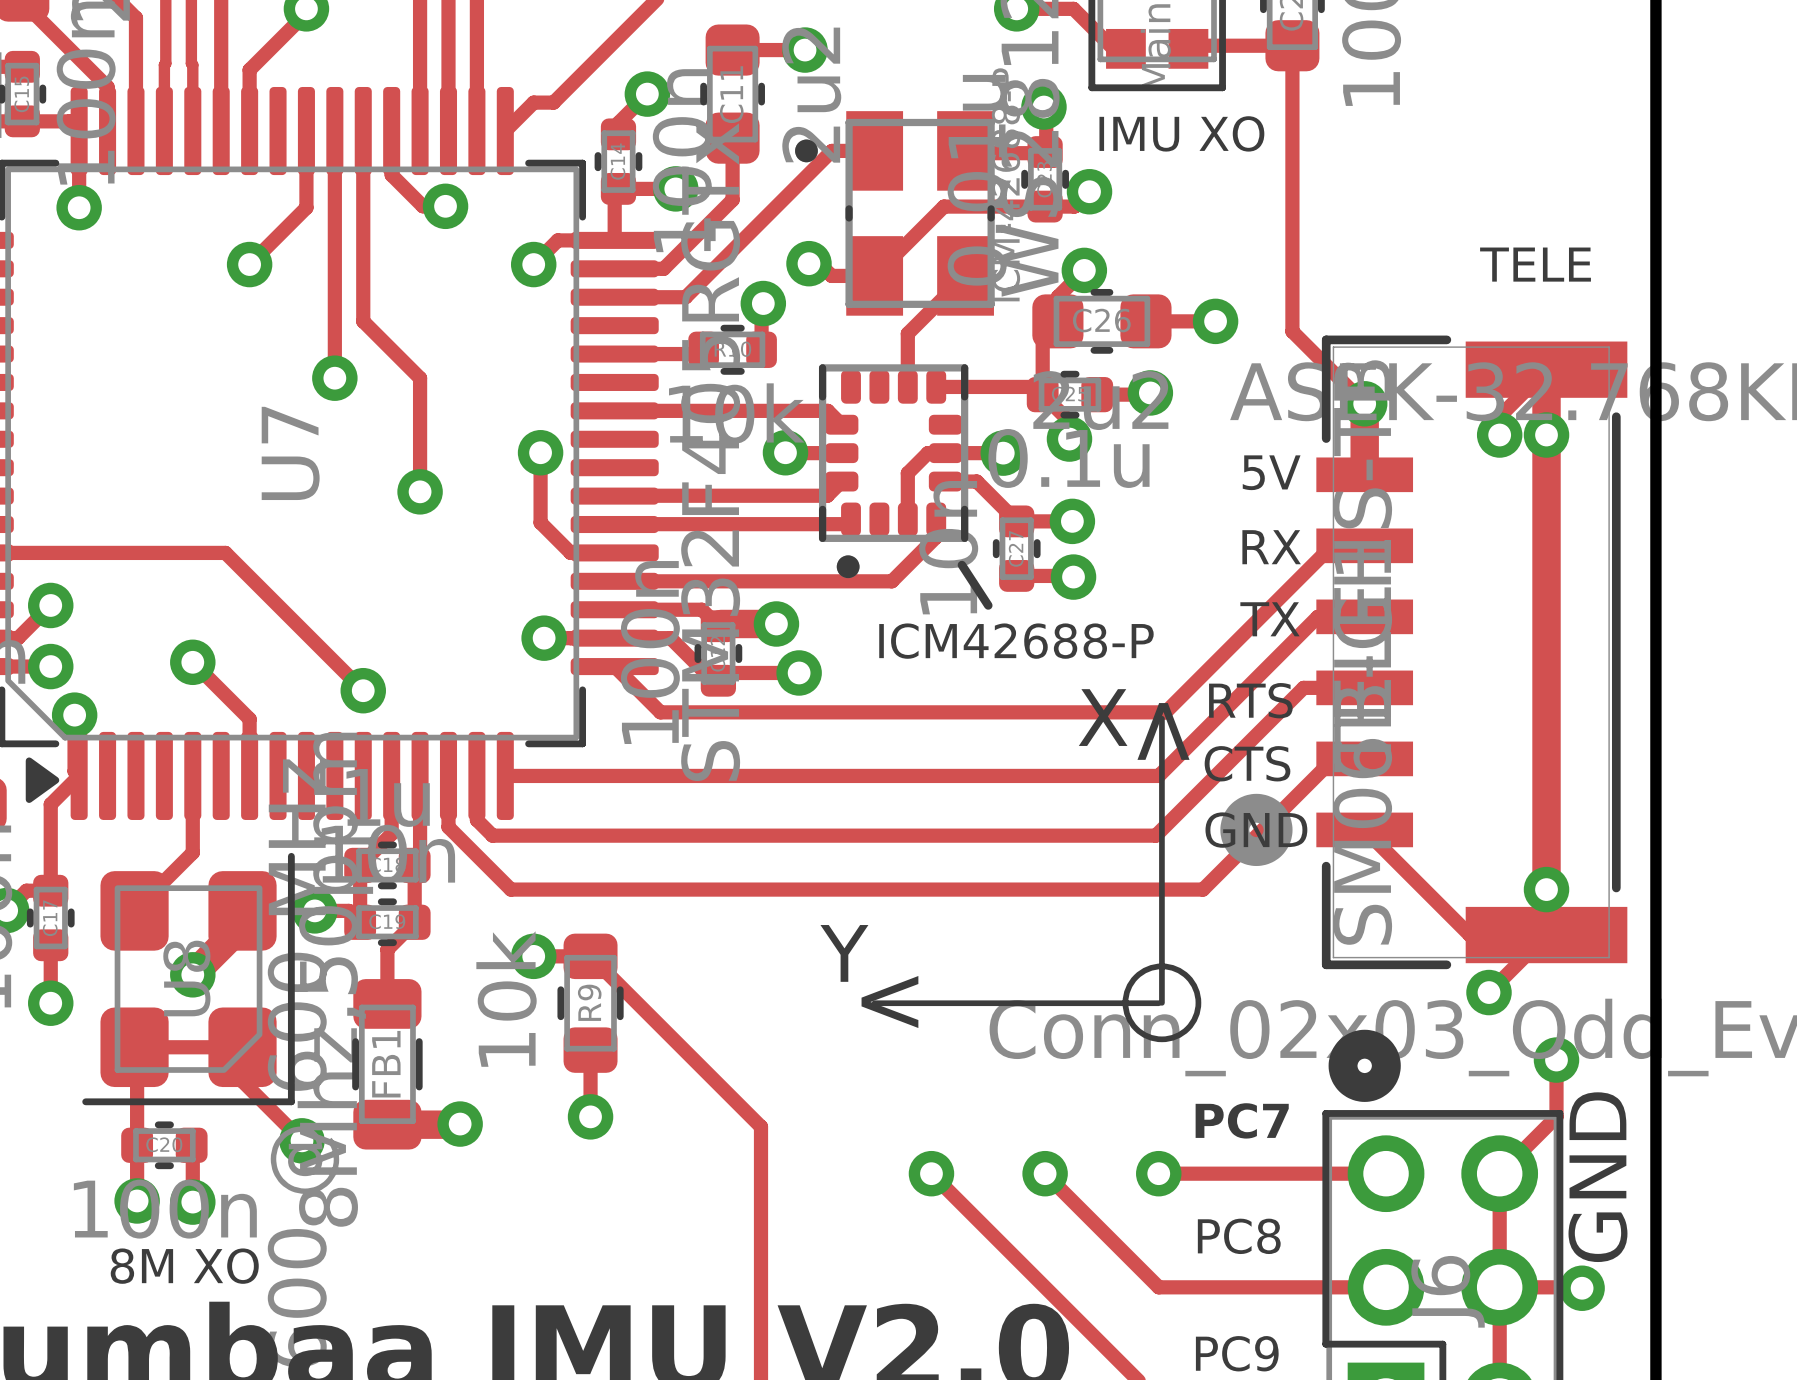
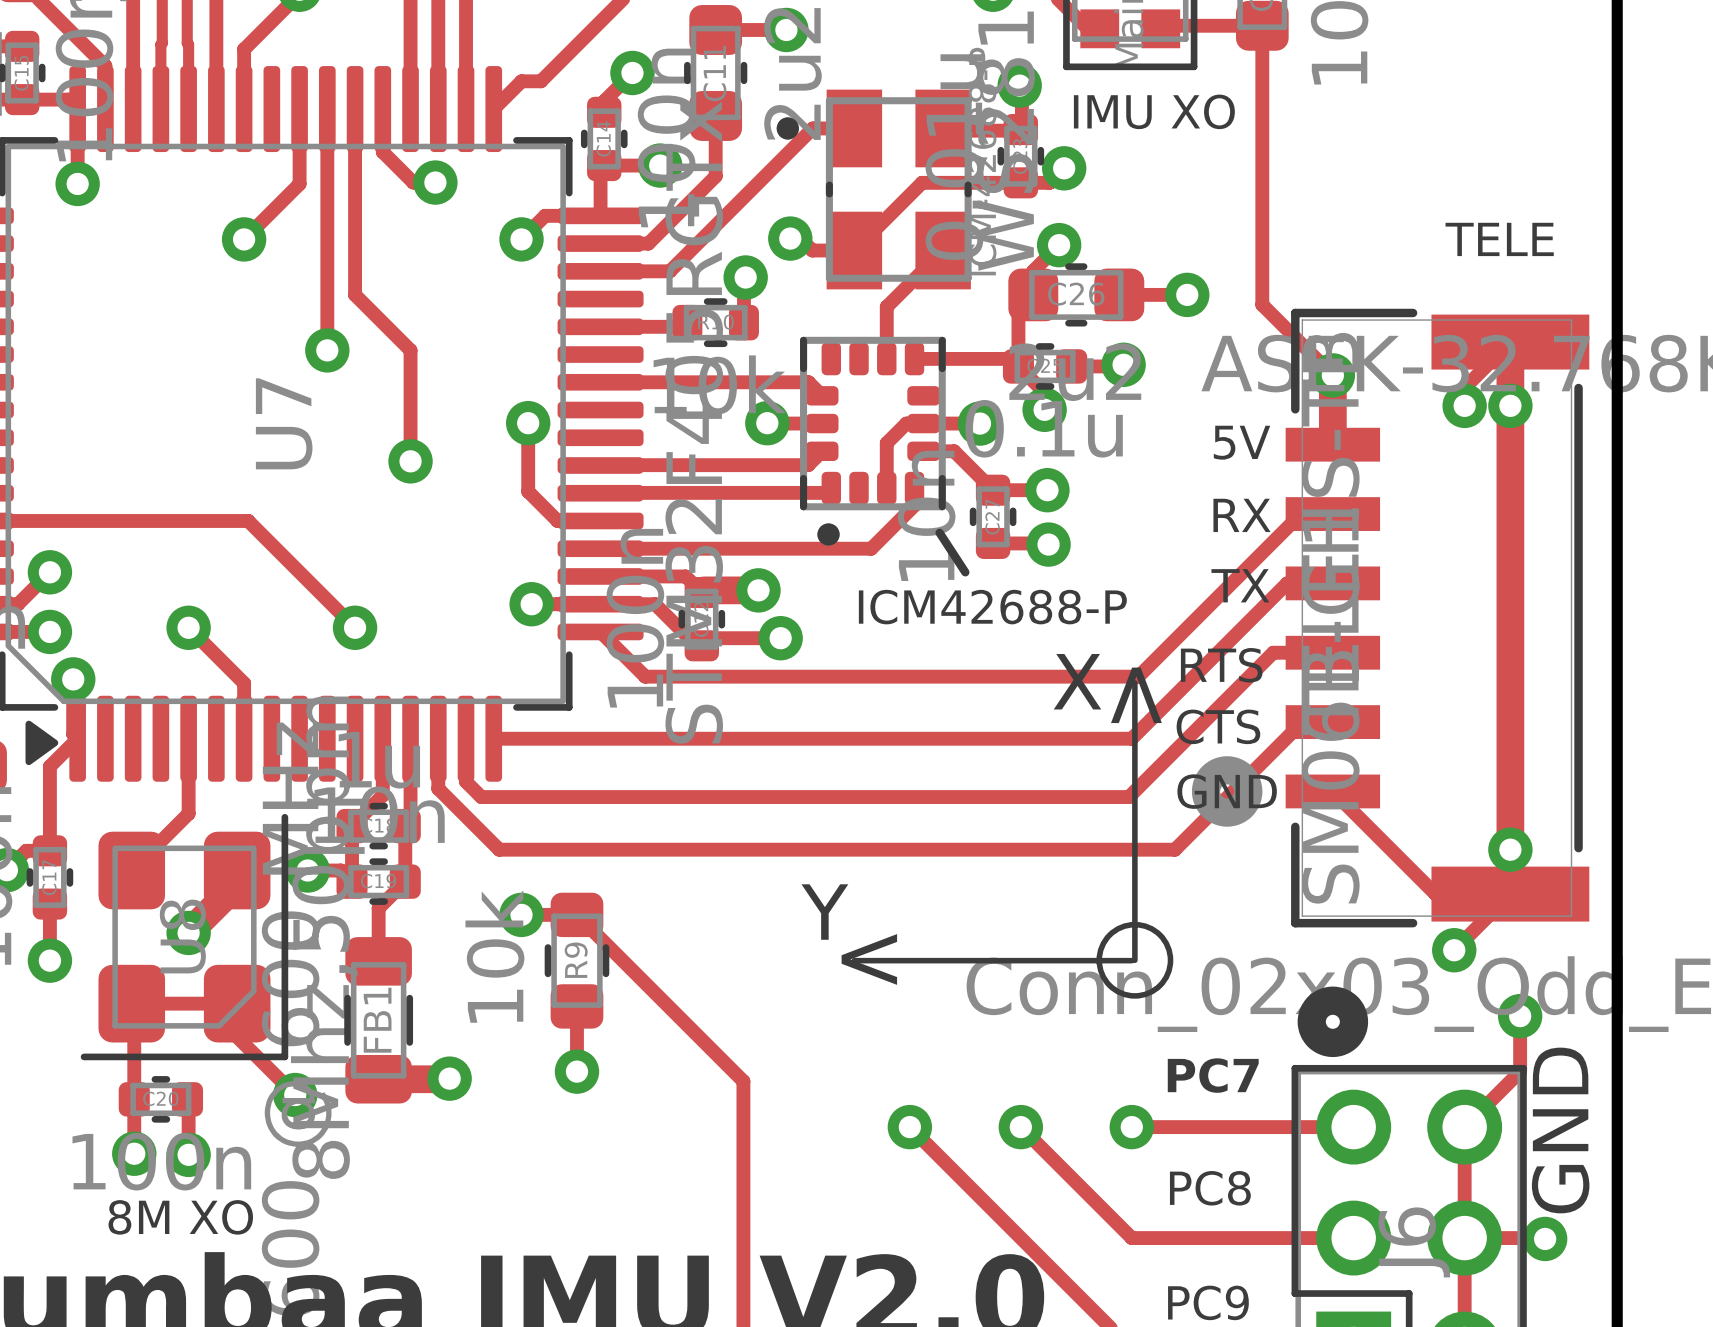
track: (225, 552) (363, 690) -> (220, 520) (248, 520) (355, 627)
via position: (363, 690) -> (355, 627)

